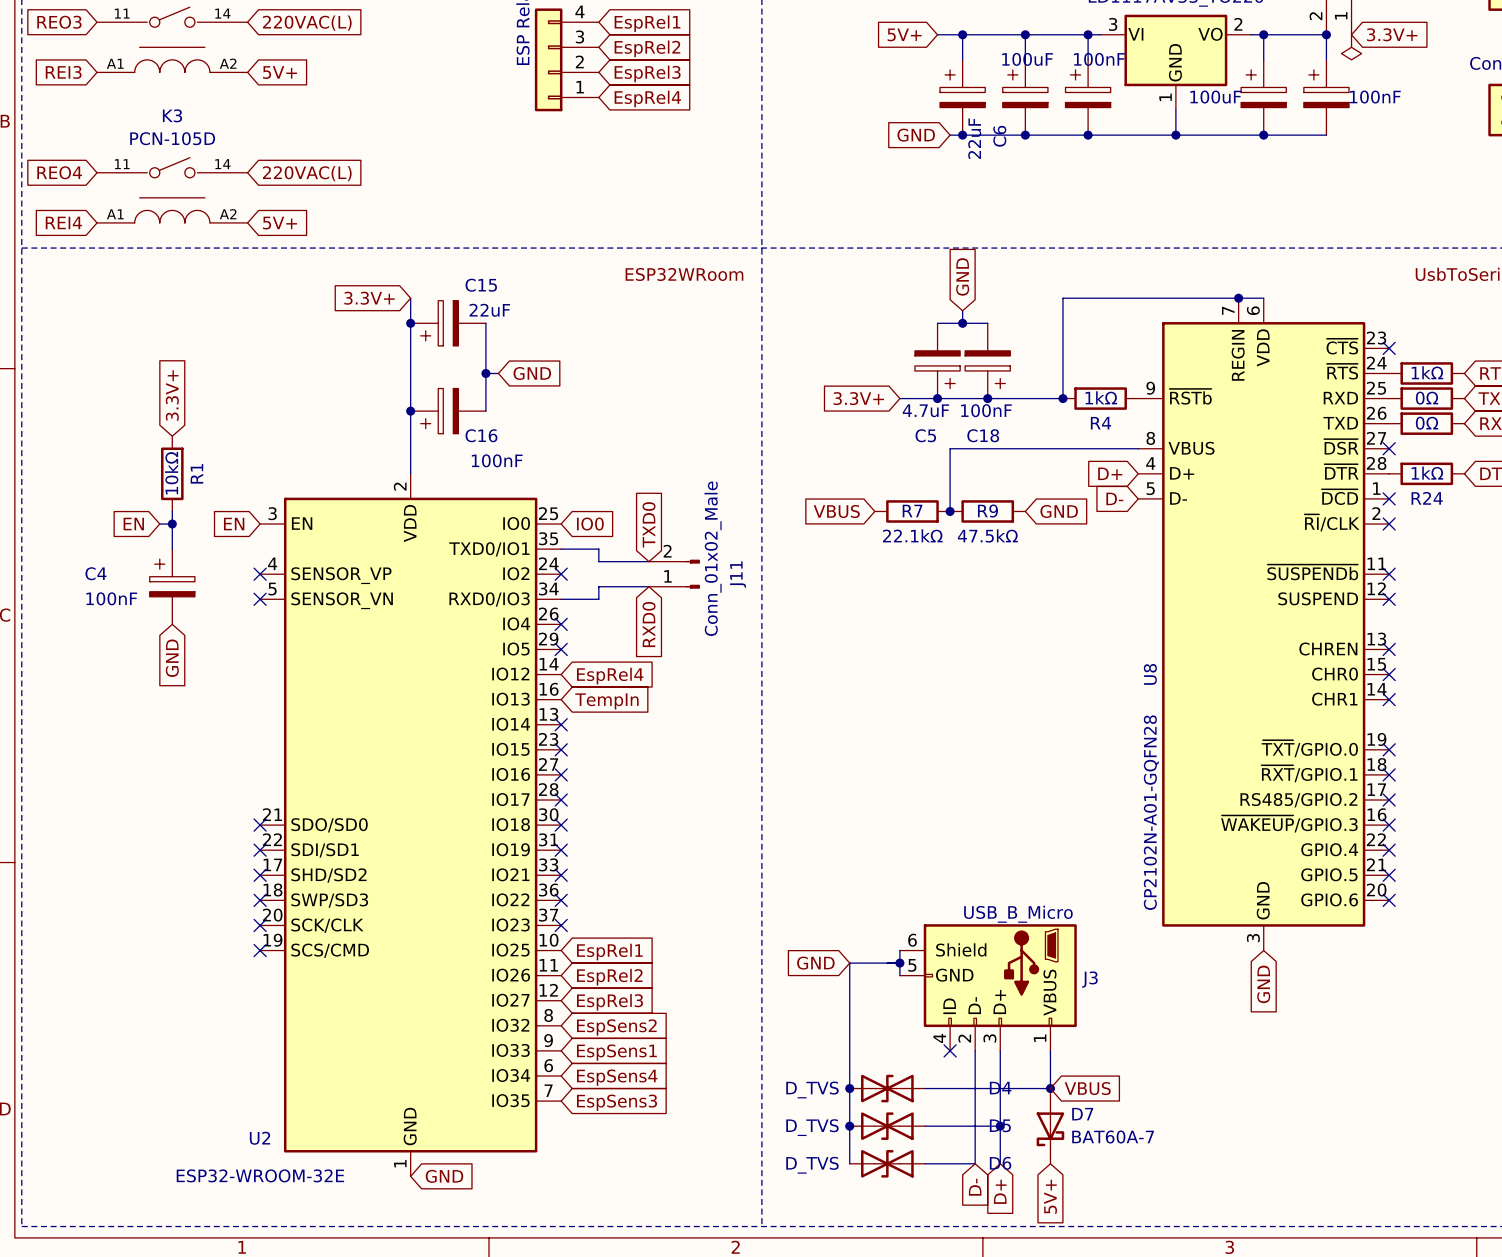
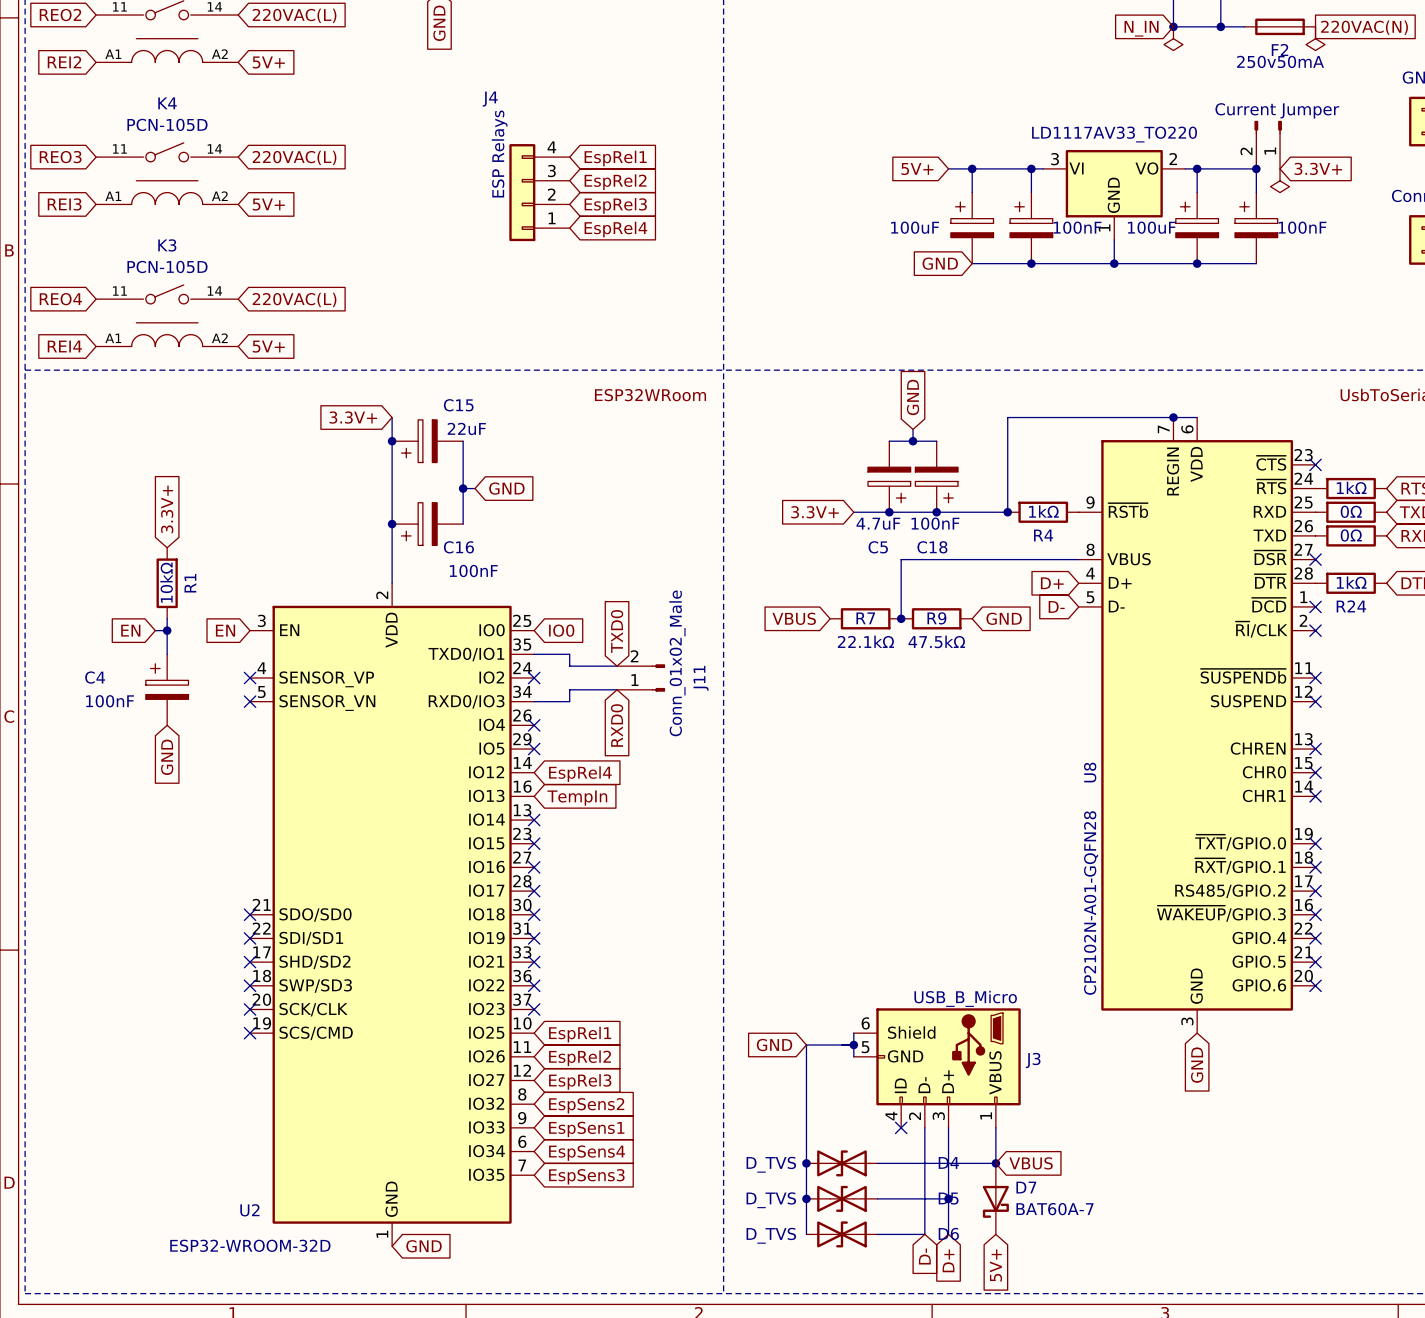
global label position: 5V+ (904, 34) -> 5V+ (917, 169)
wire: (937, 34) (1000, 34) -> none
wire: (962, 34) (962, 59) -> none
junction: (962, 34) -> none
part value position: 100uF (1027, 59) -> 100uF (915, 227)
part value position: 100nF (1099, 59) -> 100nF (1077, 227)
C6: 22uF (962, 97) -> none
global label position: GND (916, 135) -> GND (940, 263)
wire: (950, 135) (1025, 135) -> none
junction: (962, 135) -> none
junction: (1025, 135) -> none
U2 value: ESP32-WROOM-32E (260, 1175) -> ESP32-WROOM-32D (250, 1245)

